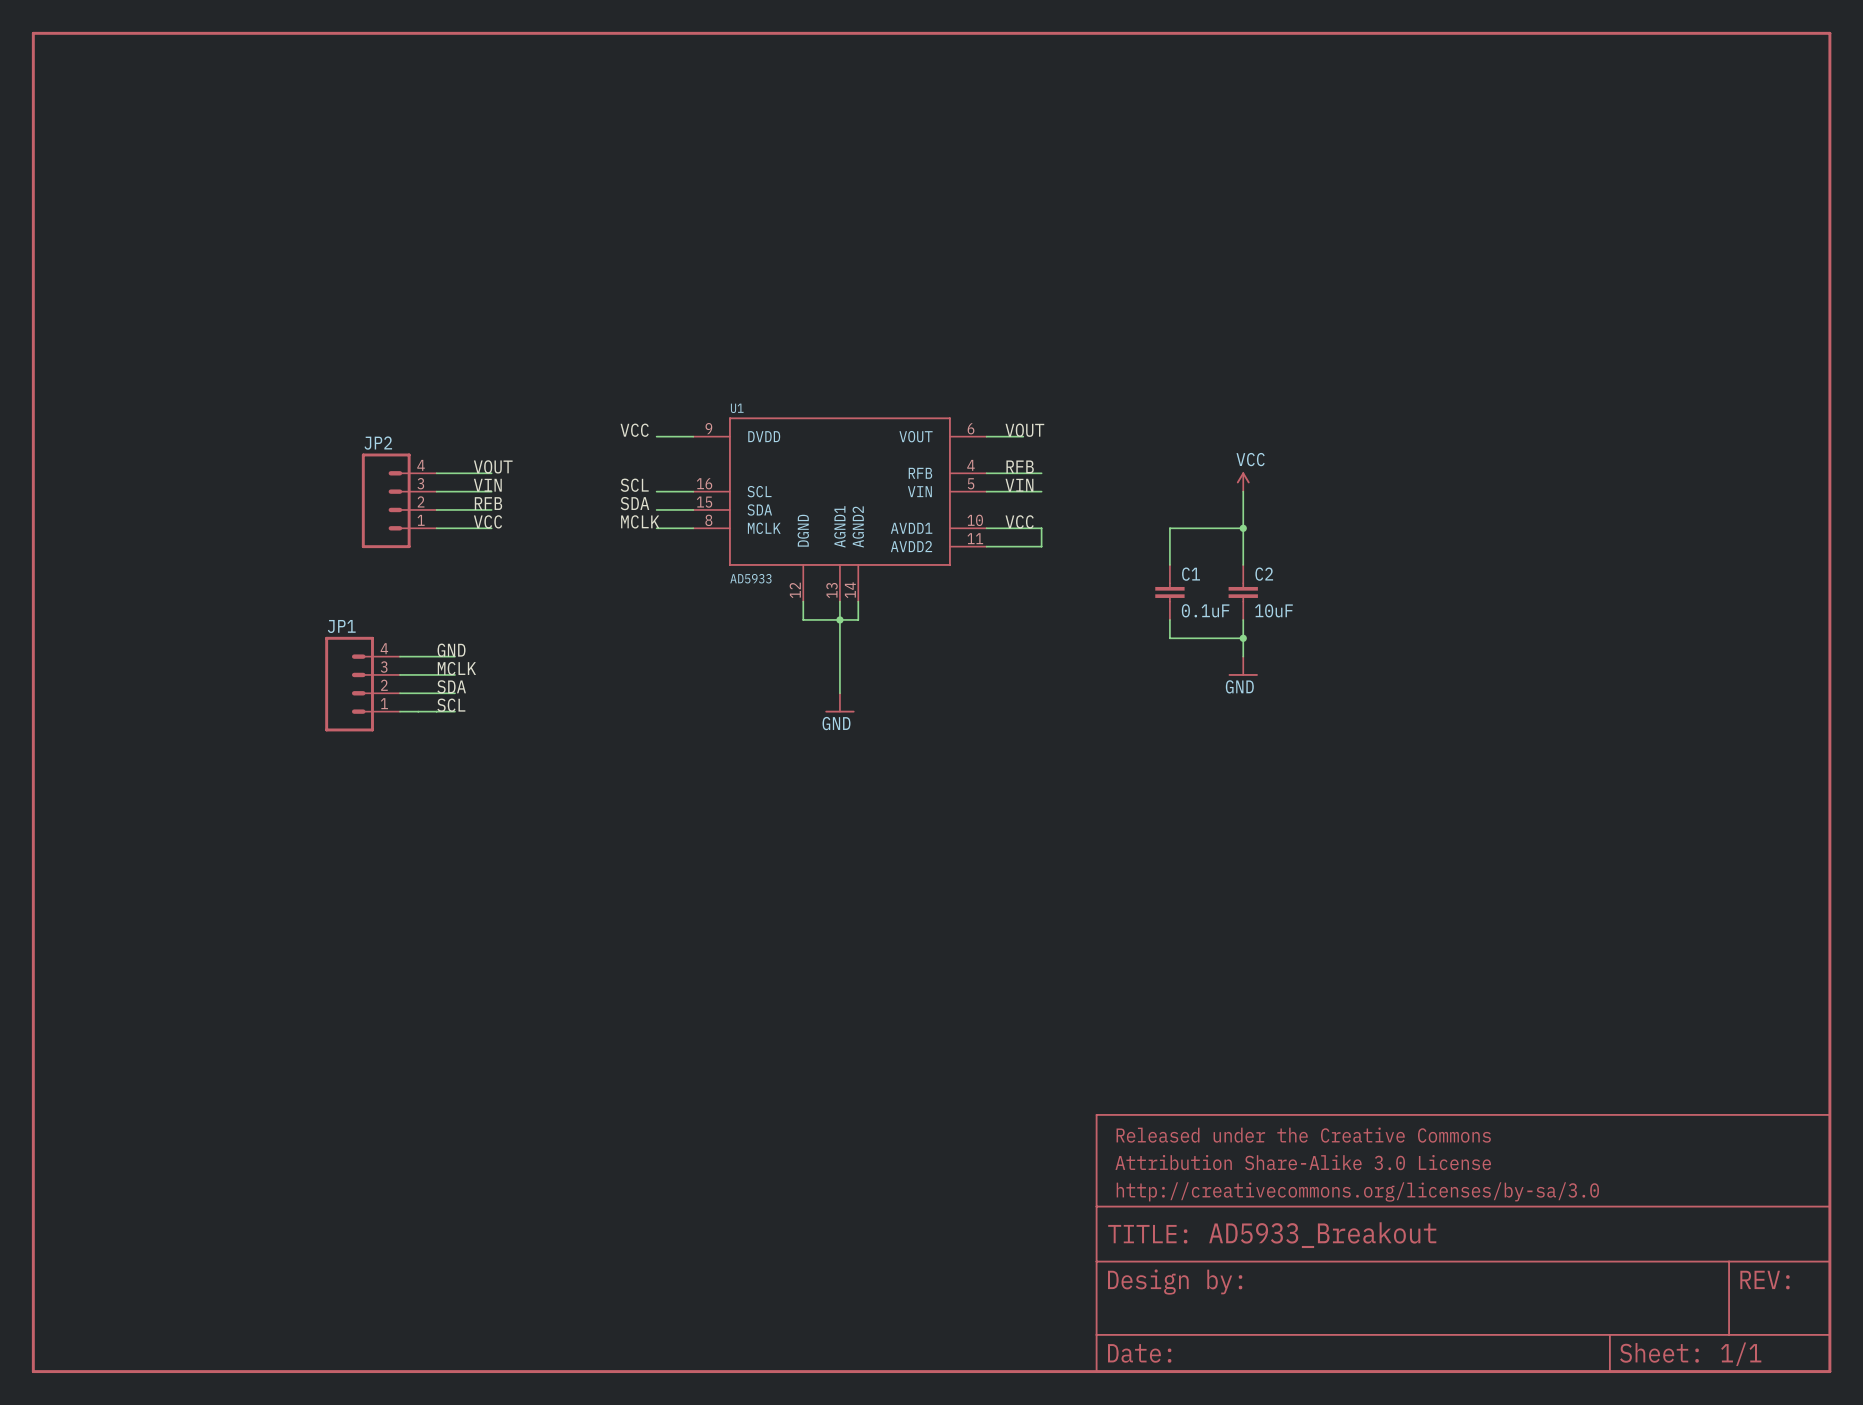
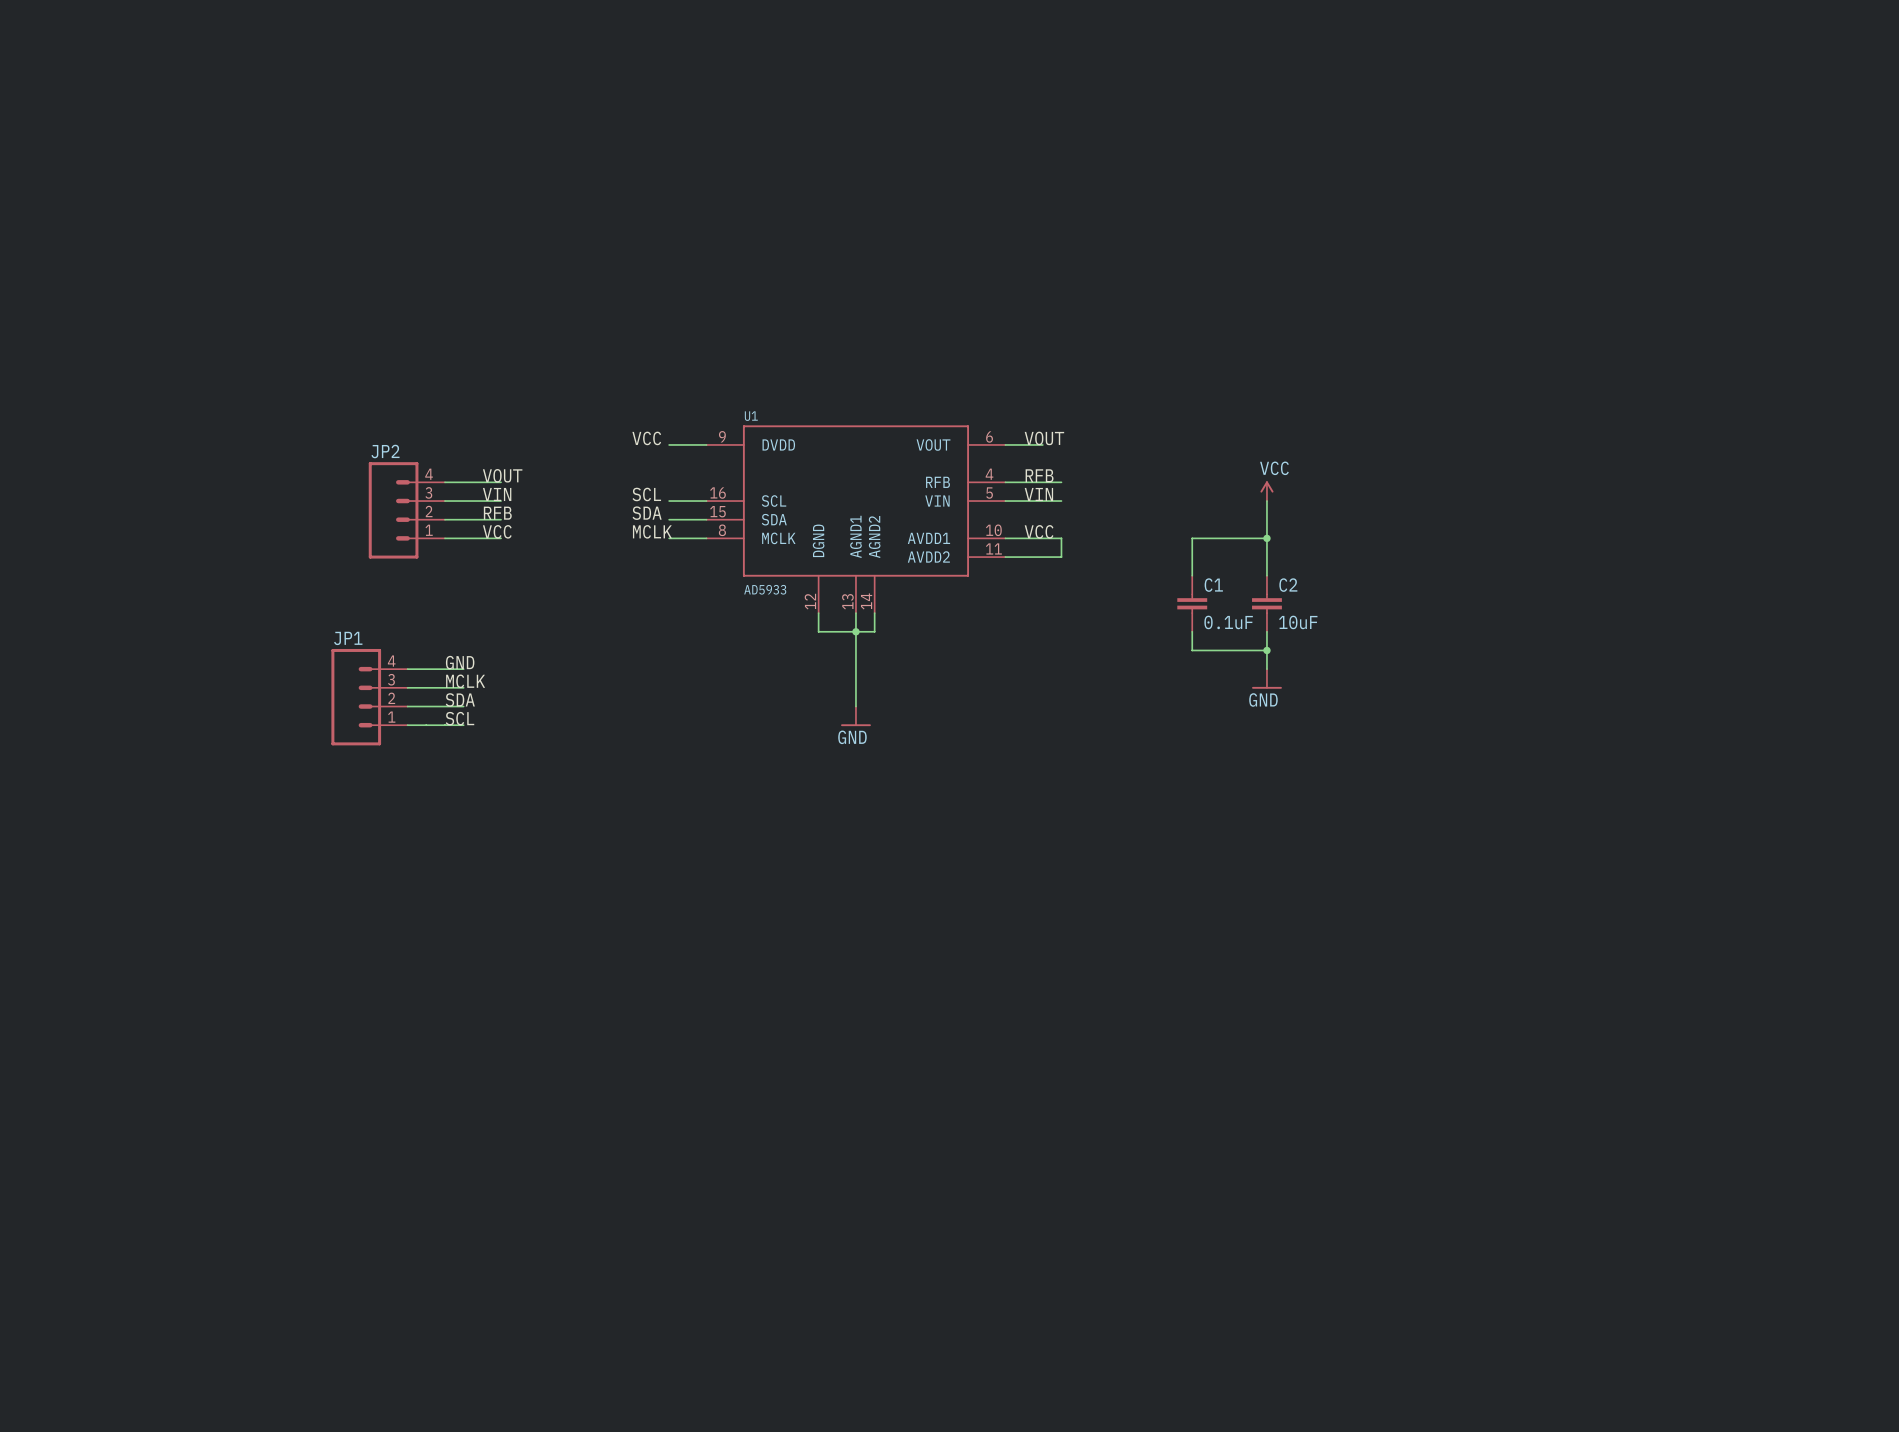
part: (931, 702) -> none
part: (1463, 1243) -> none

